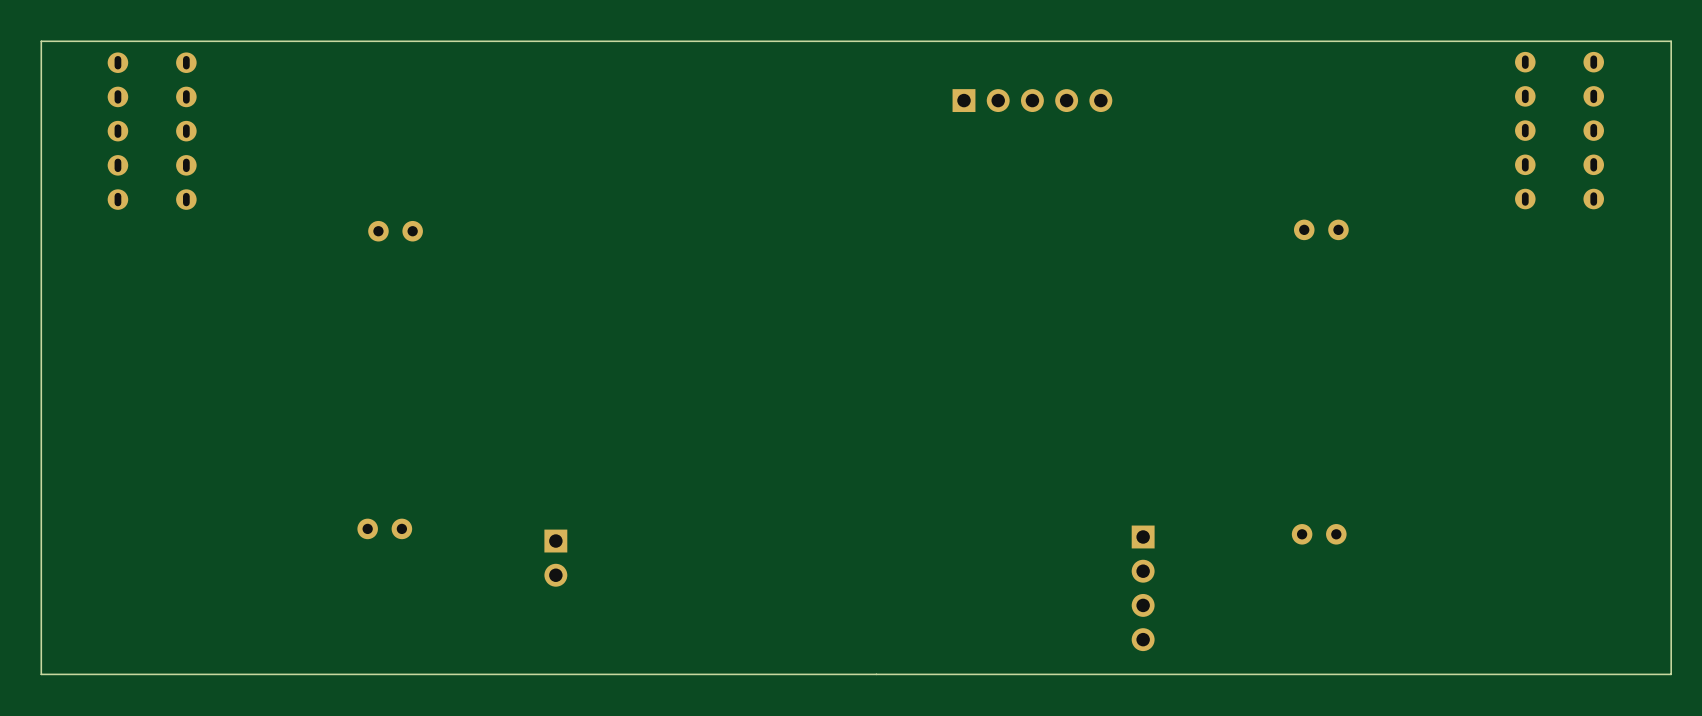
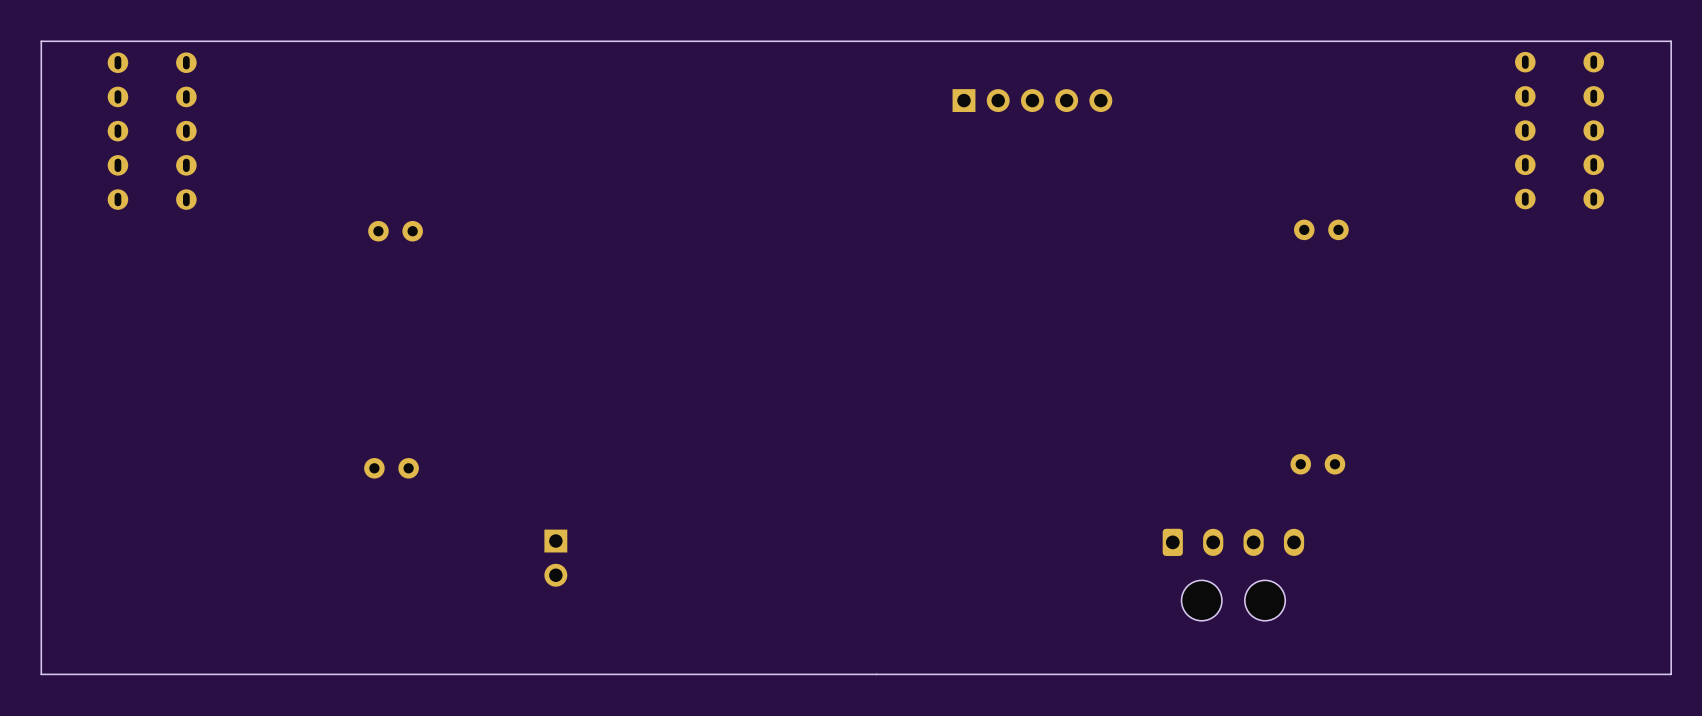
part position: (384, 528) -> (391, 468)
part position: (1319, 534) -> (1317, 464)
part: none -> (1233, 574)
part: (1143, 588) -> none

